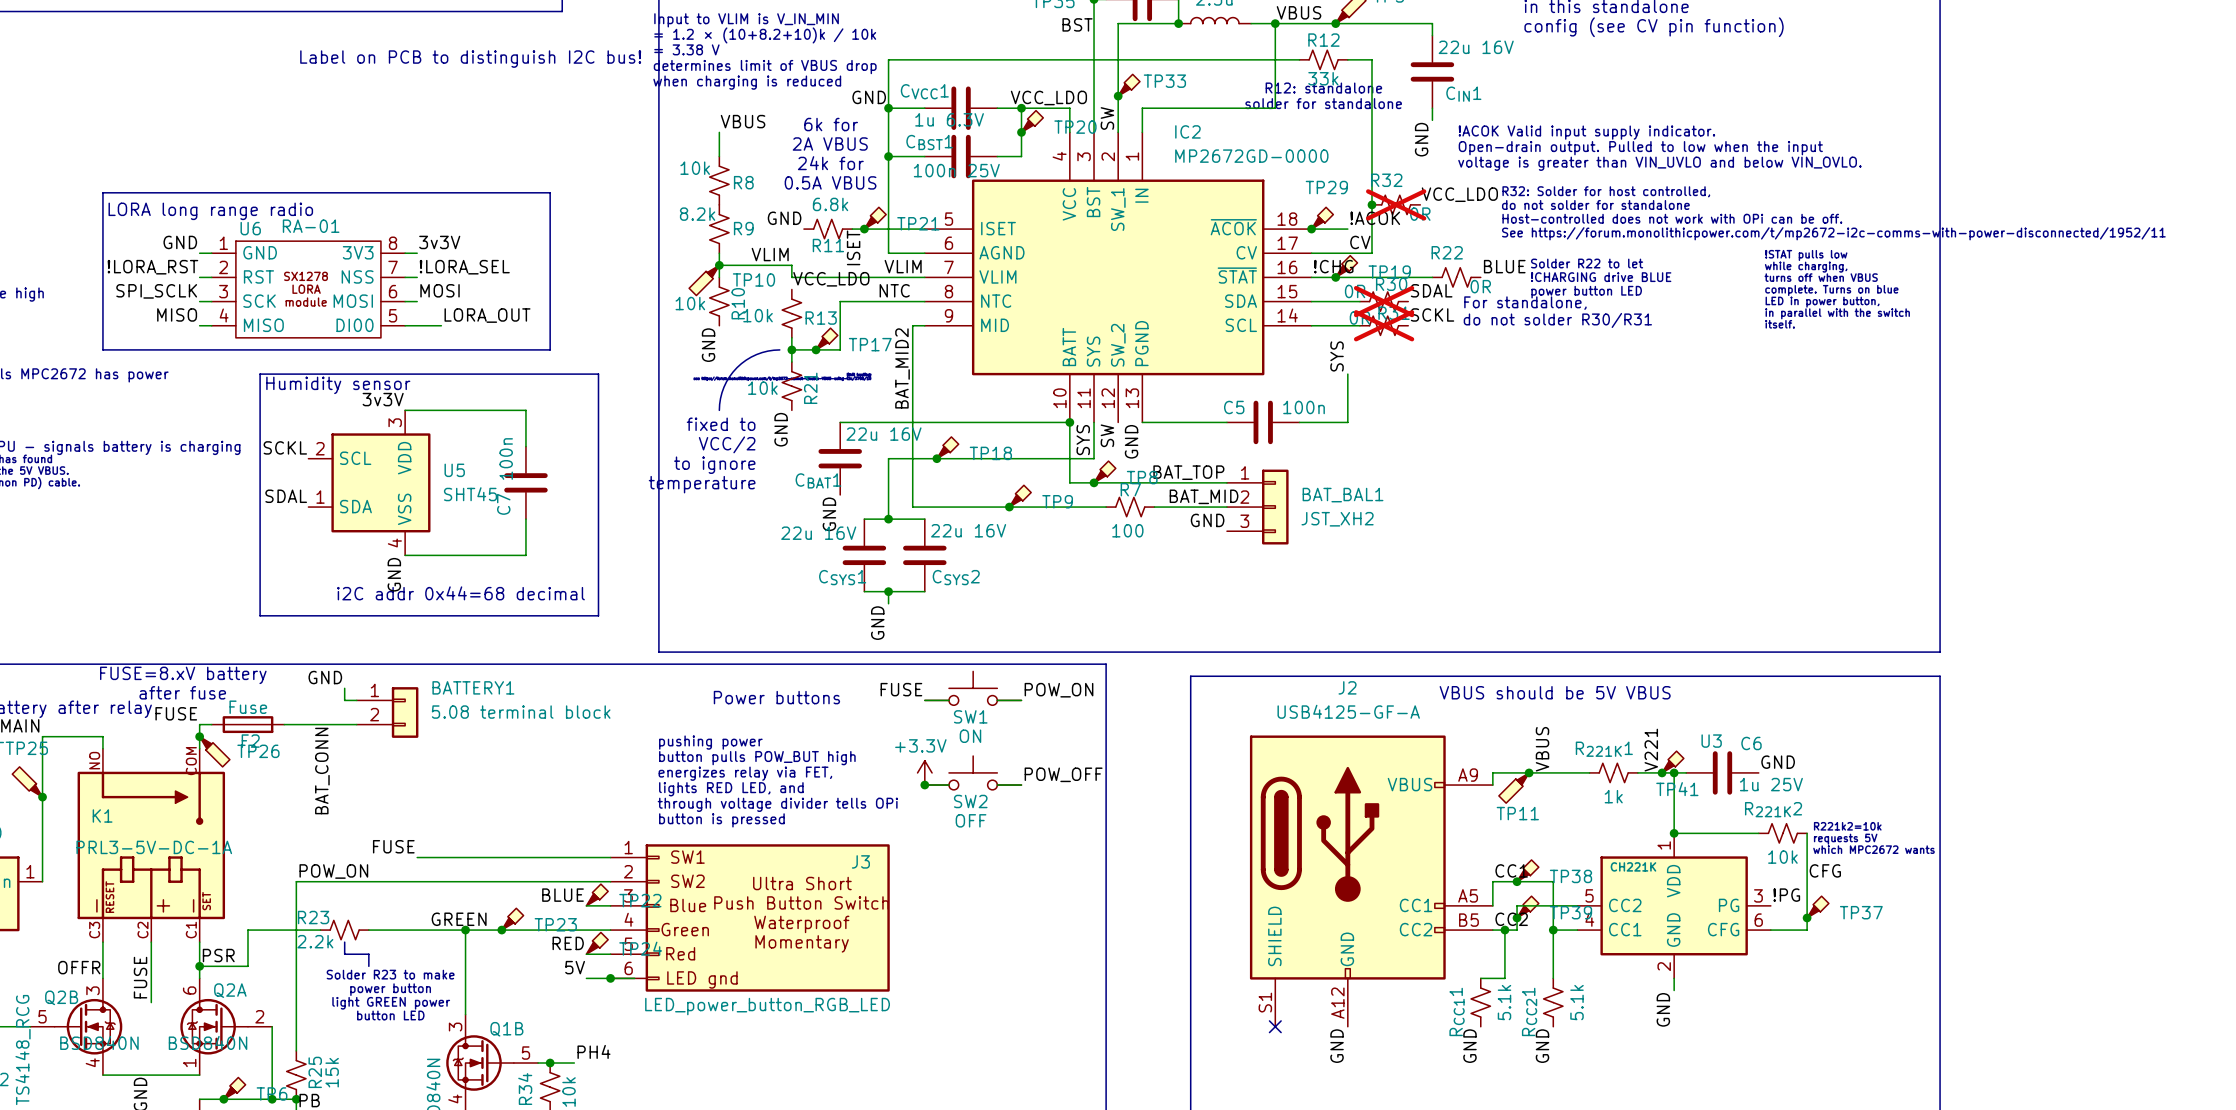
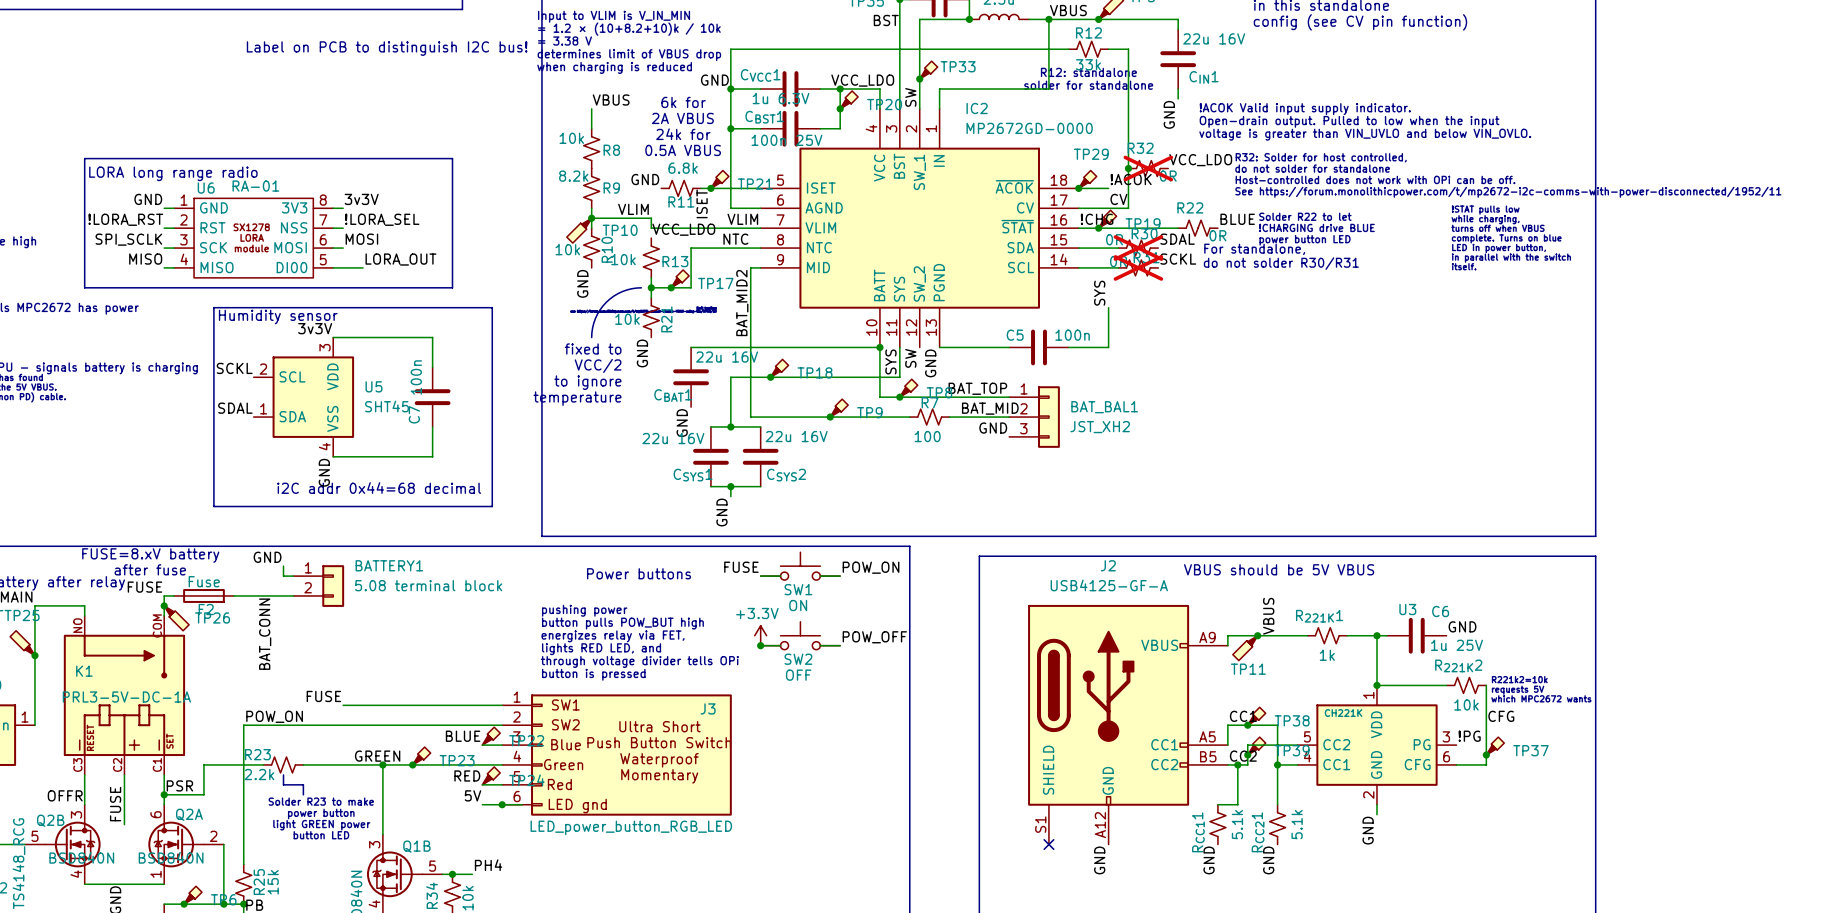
label: V221 (1651, 750) -> none
TP41: (1672, 762) -> none
junction: (1662, 772) -> none

